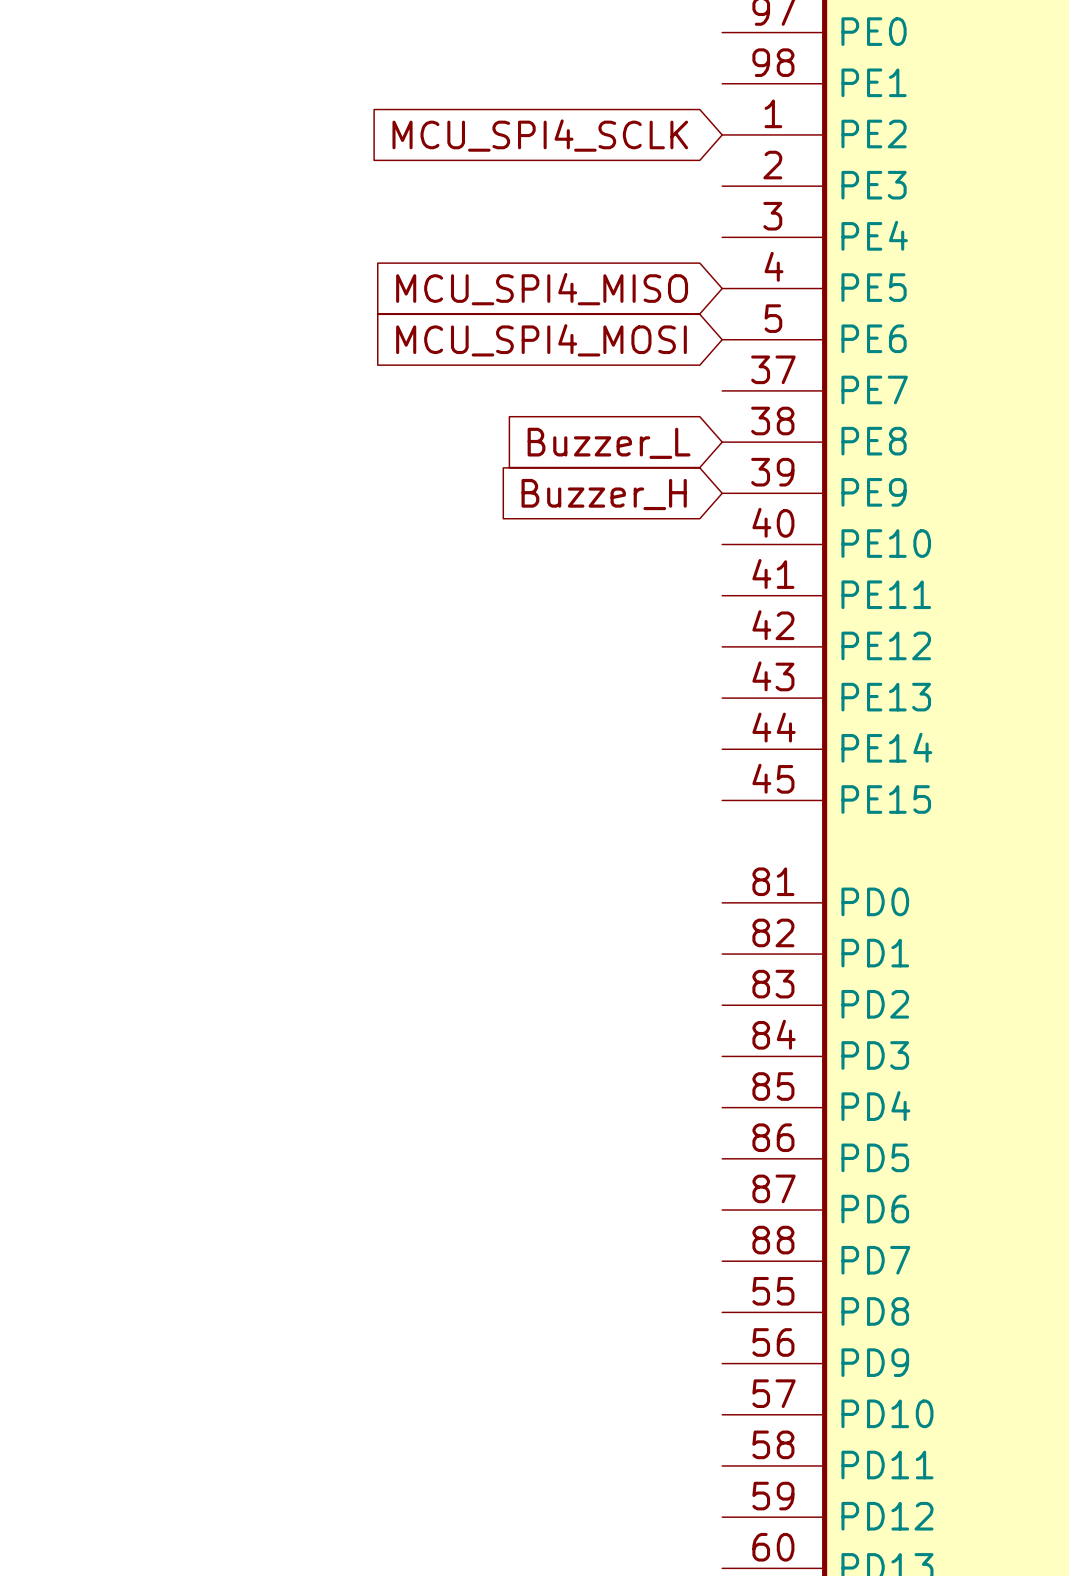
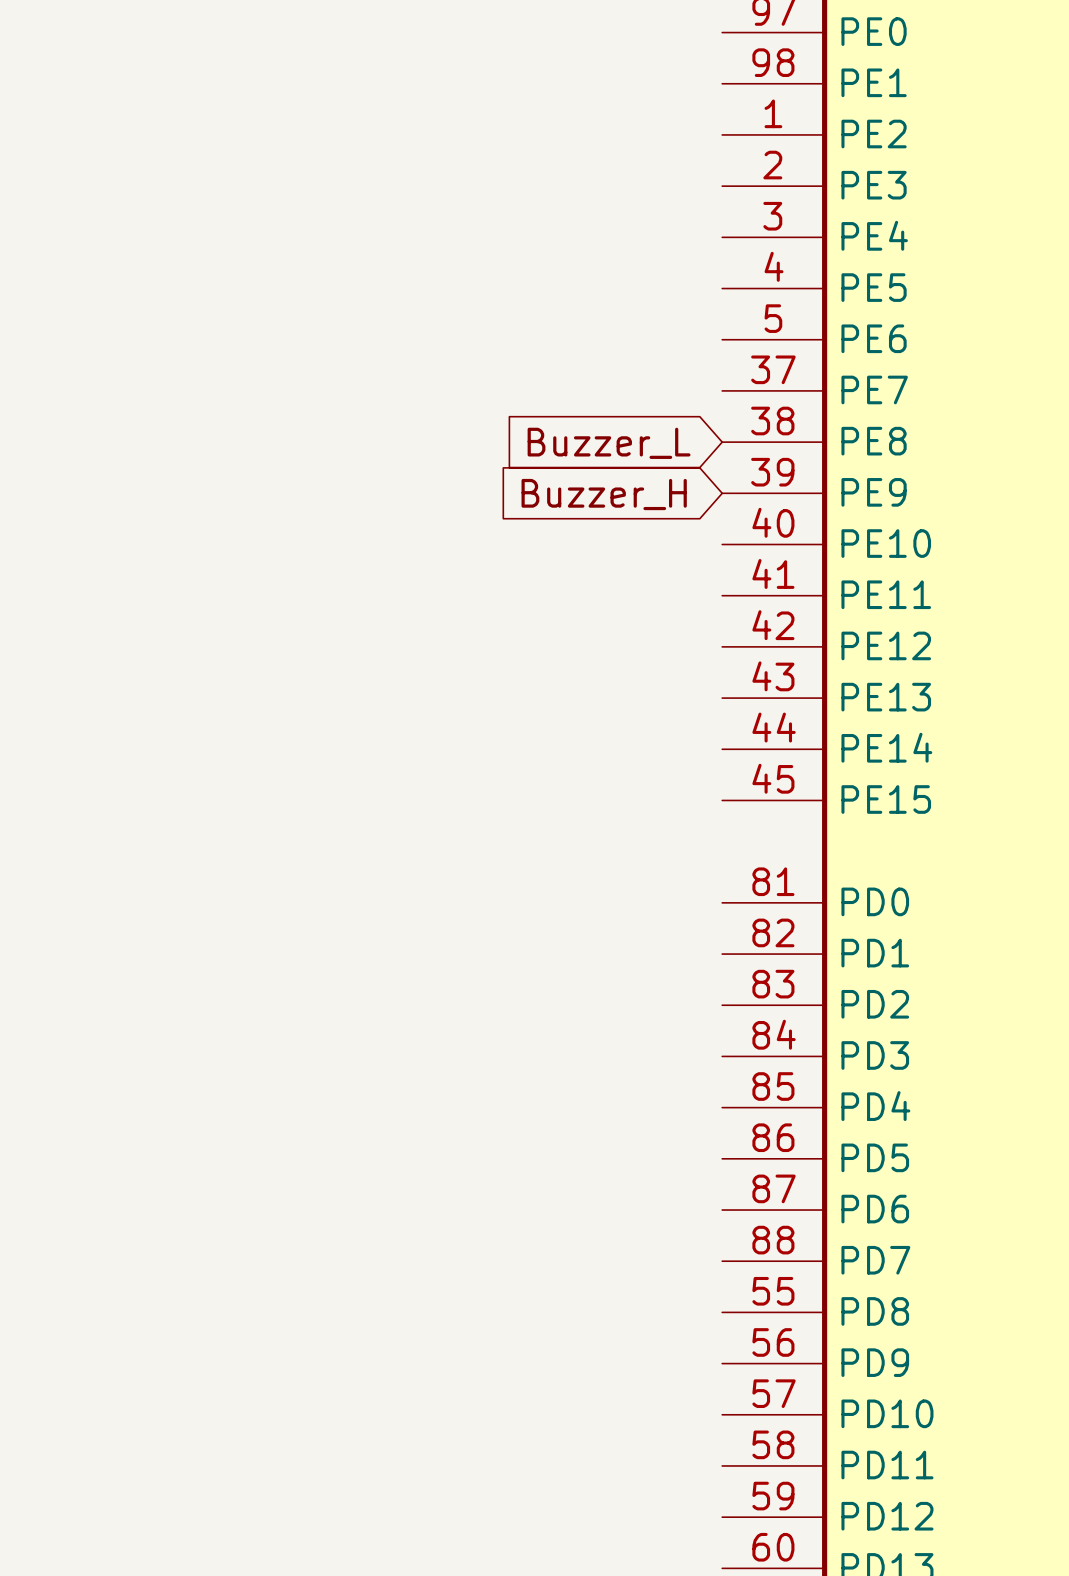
global label: MCU_SPI4_SCLK (540, 135) -> none
global label: MCU_SPI4_MISO (542, 289) -> none
global label: MCU_SPI4_MOSI (541, 340) -> none

